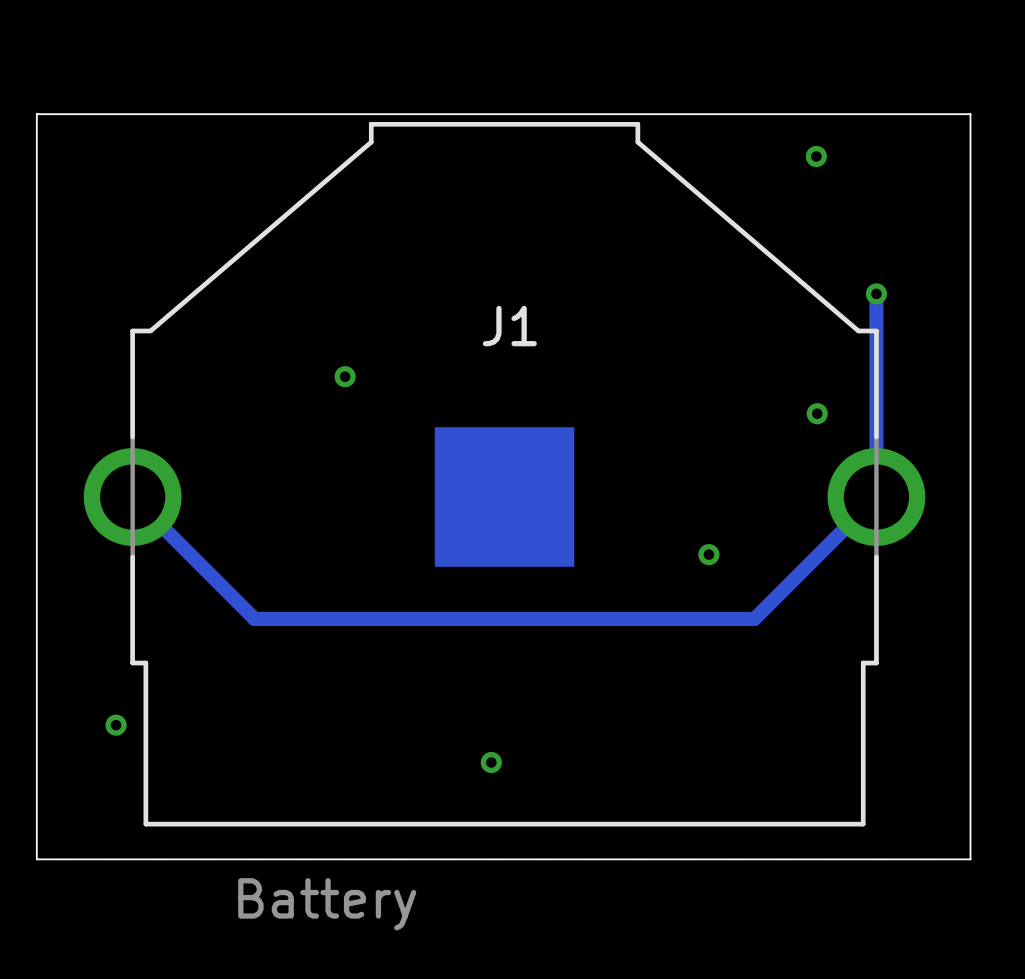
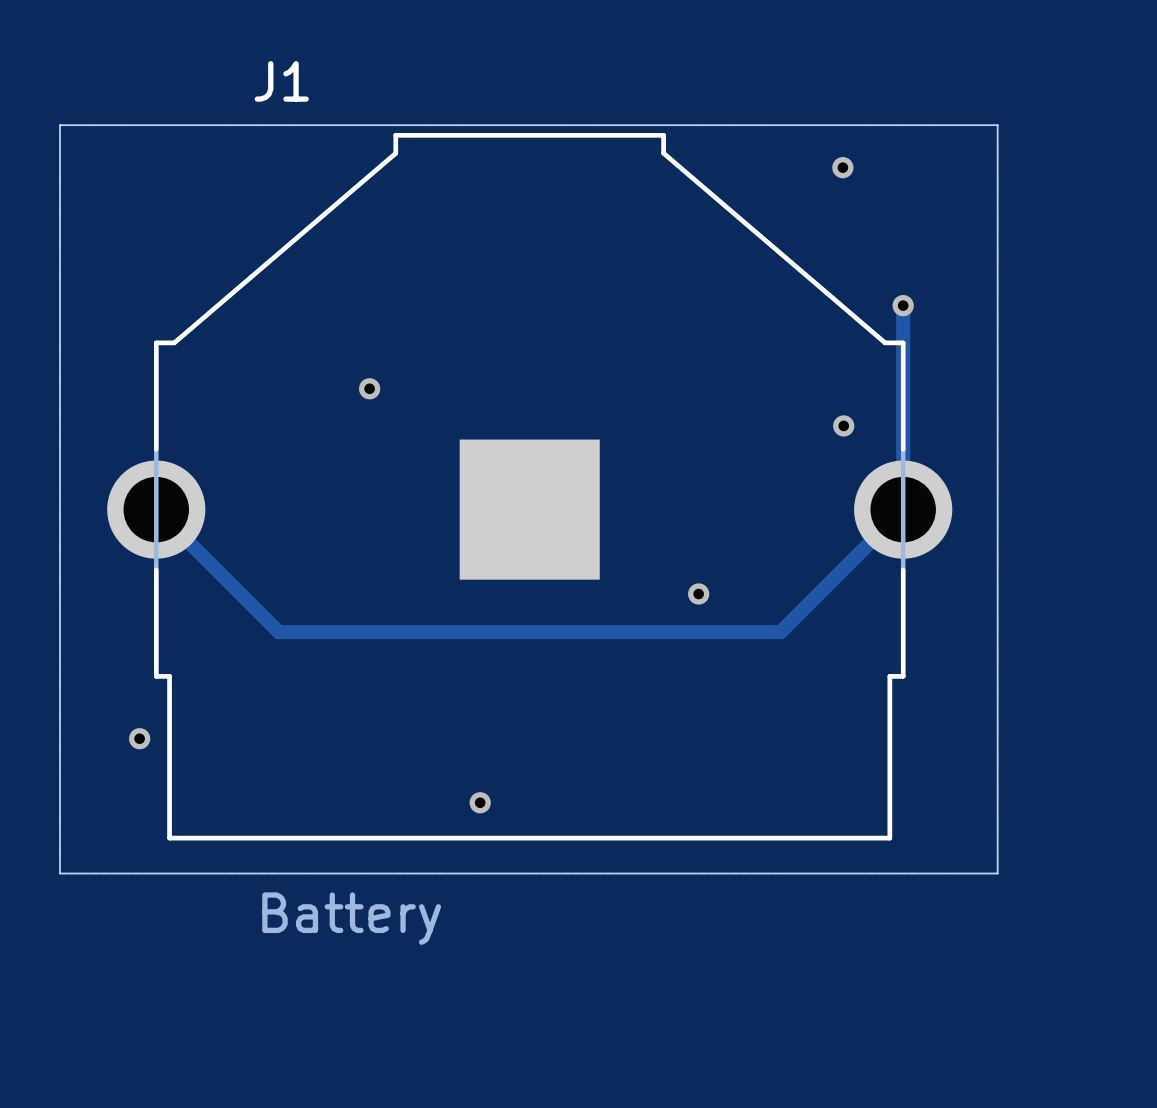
J1 name position: J1 (509, 326) -> J1 (281, 81)
via position: (708, 554) -> (698, 594)
via position: (491, 762) -> (480, 802)

